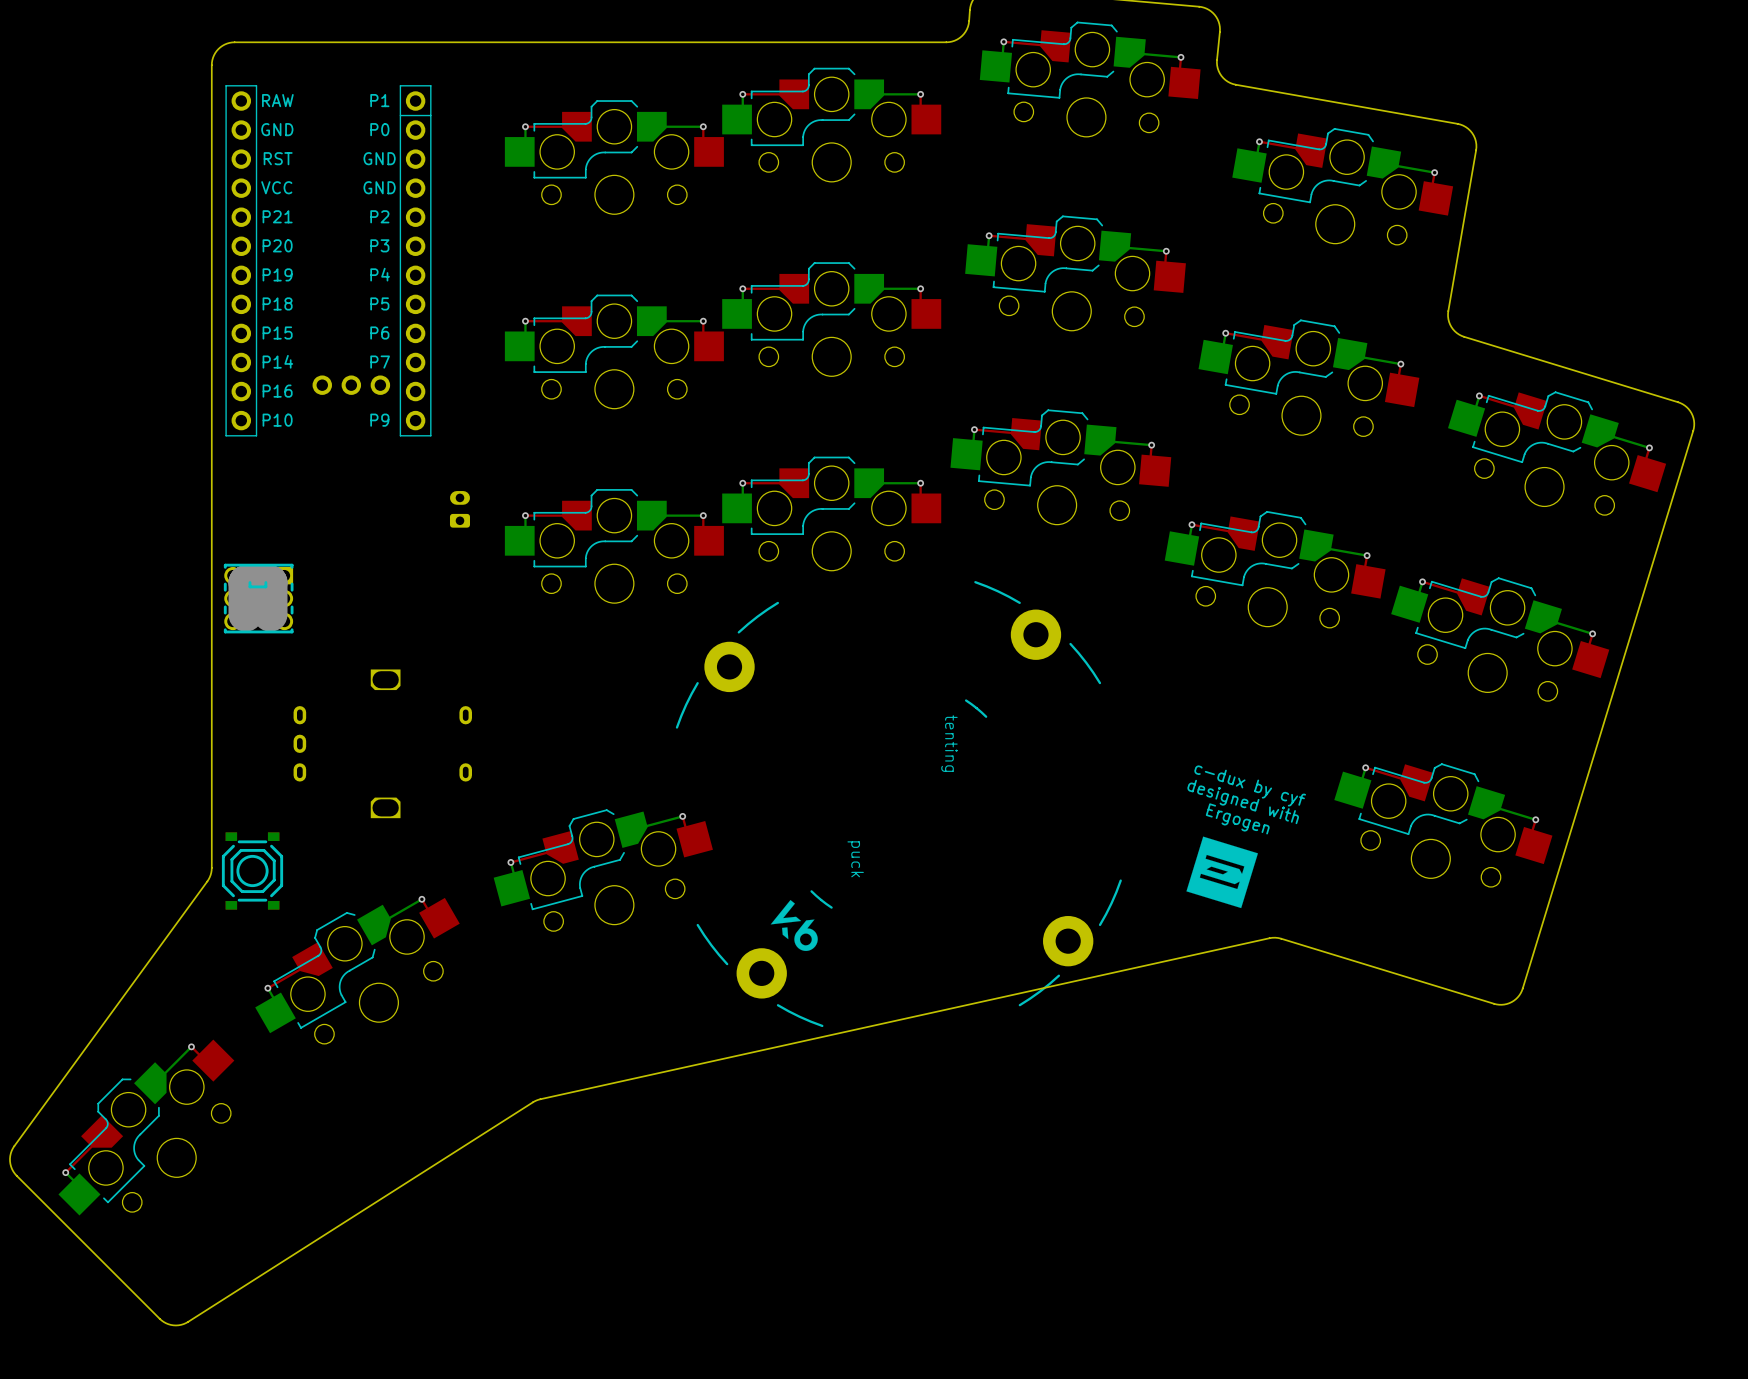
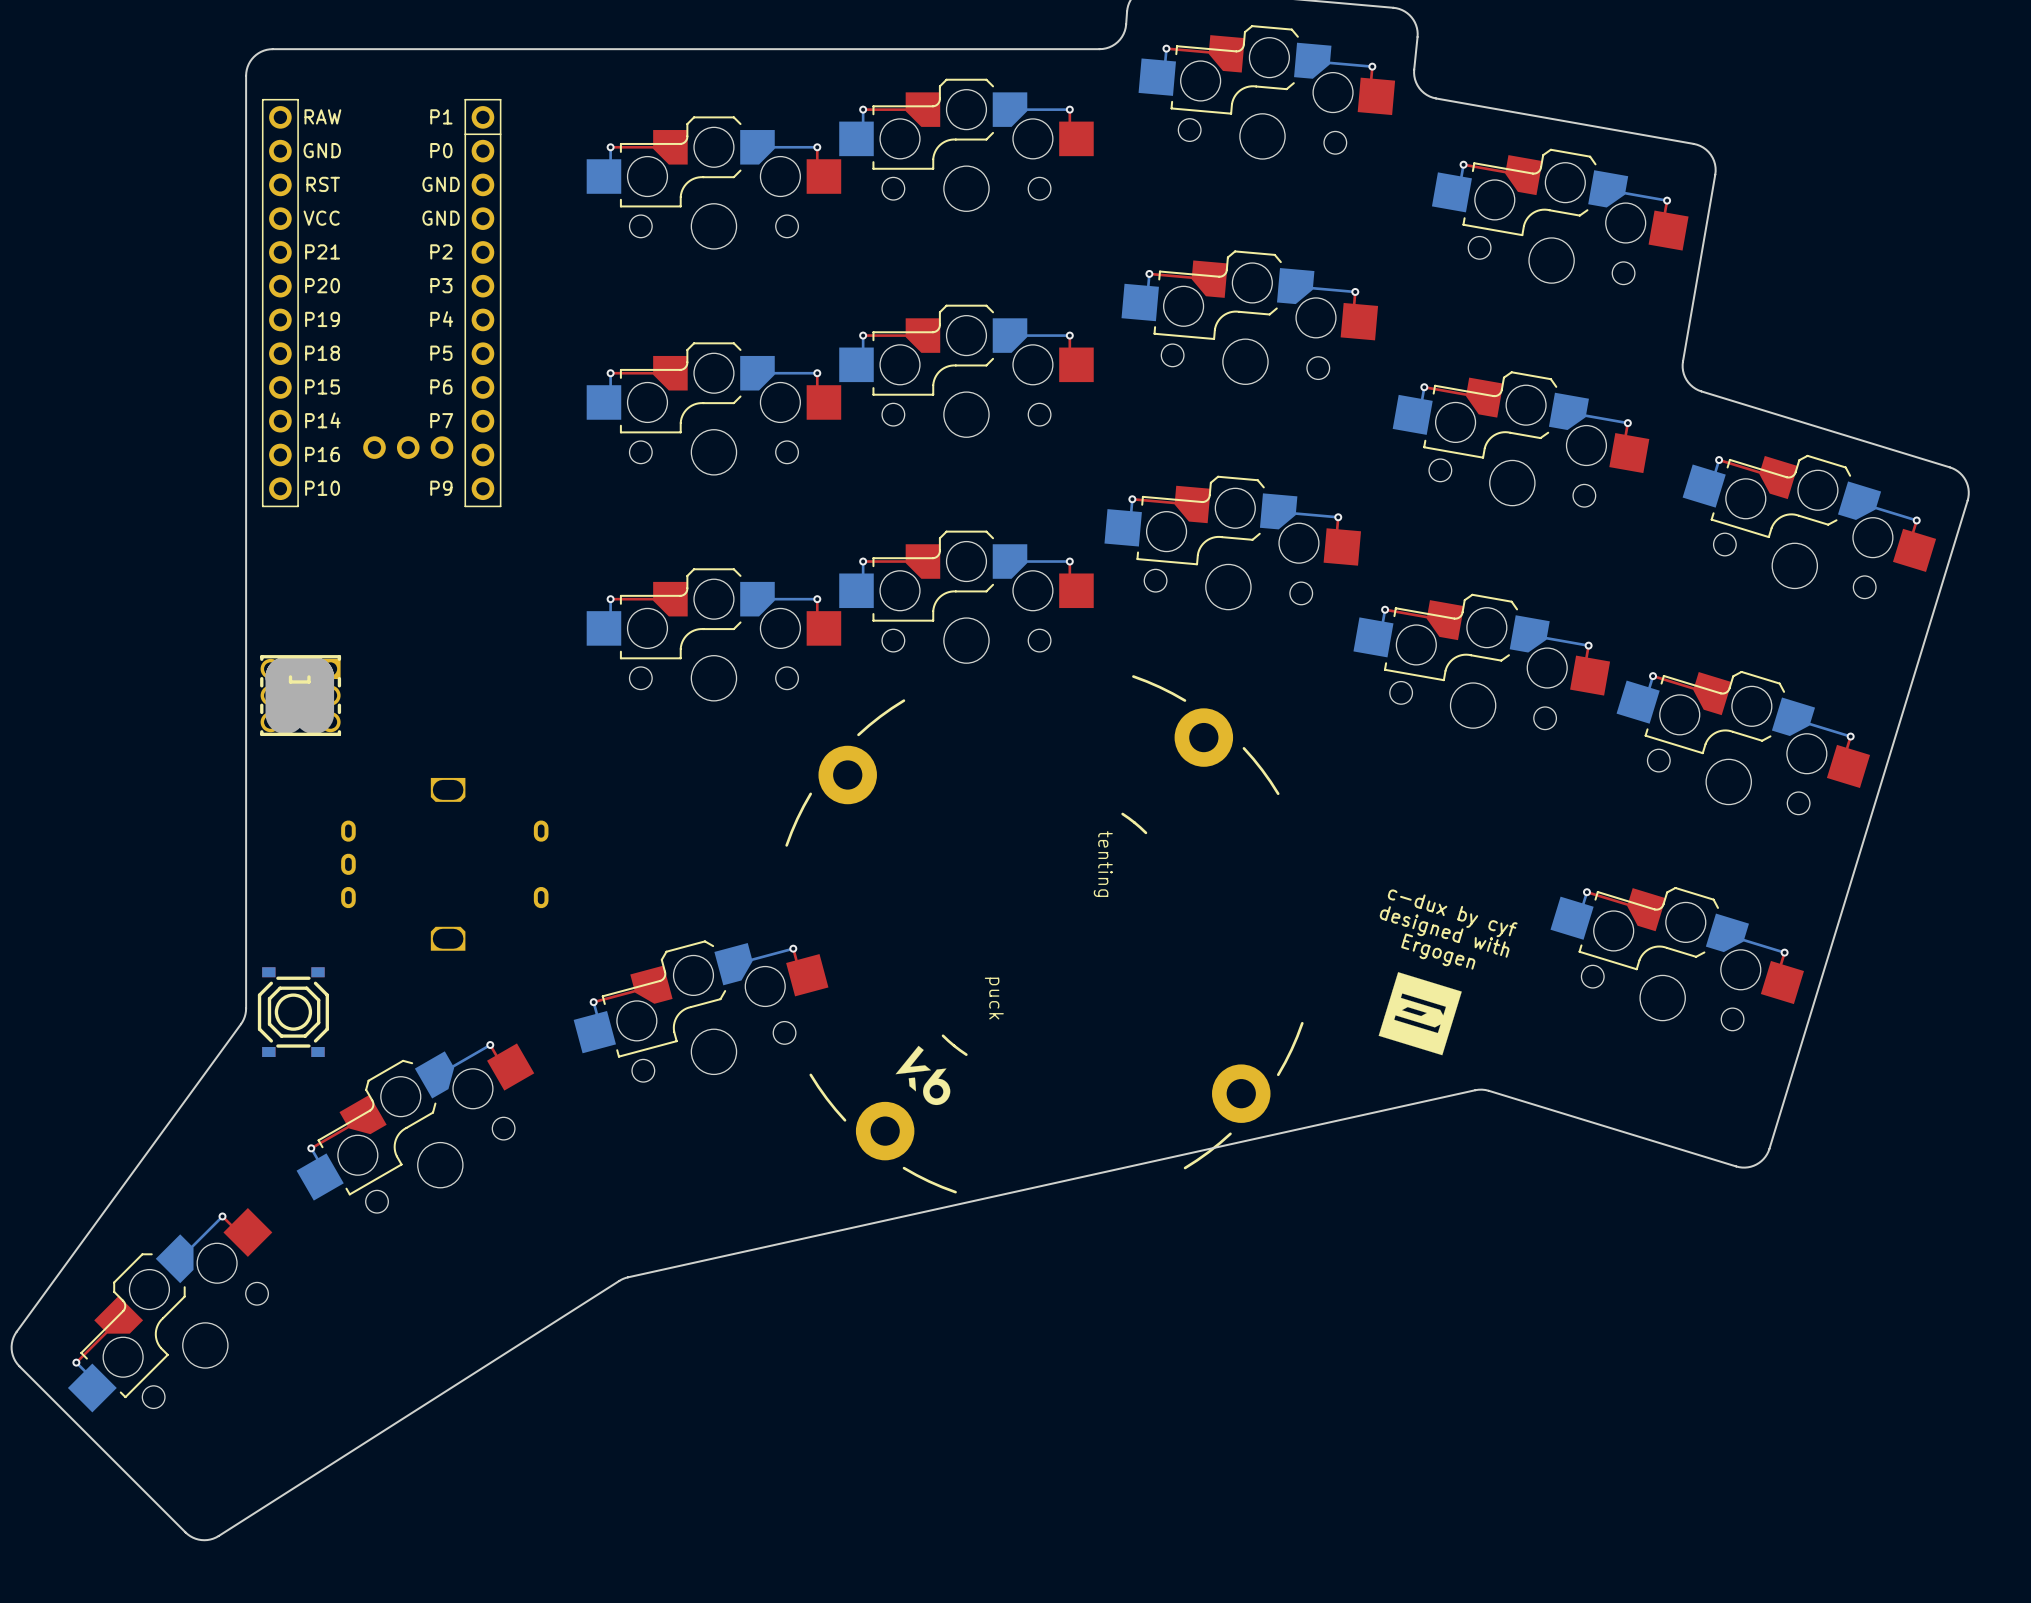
part: (459, 509) -> none

